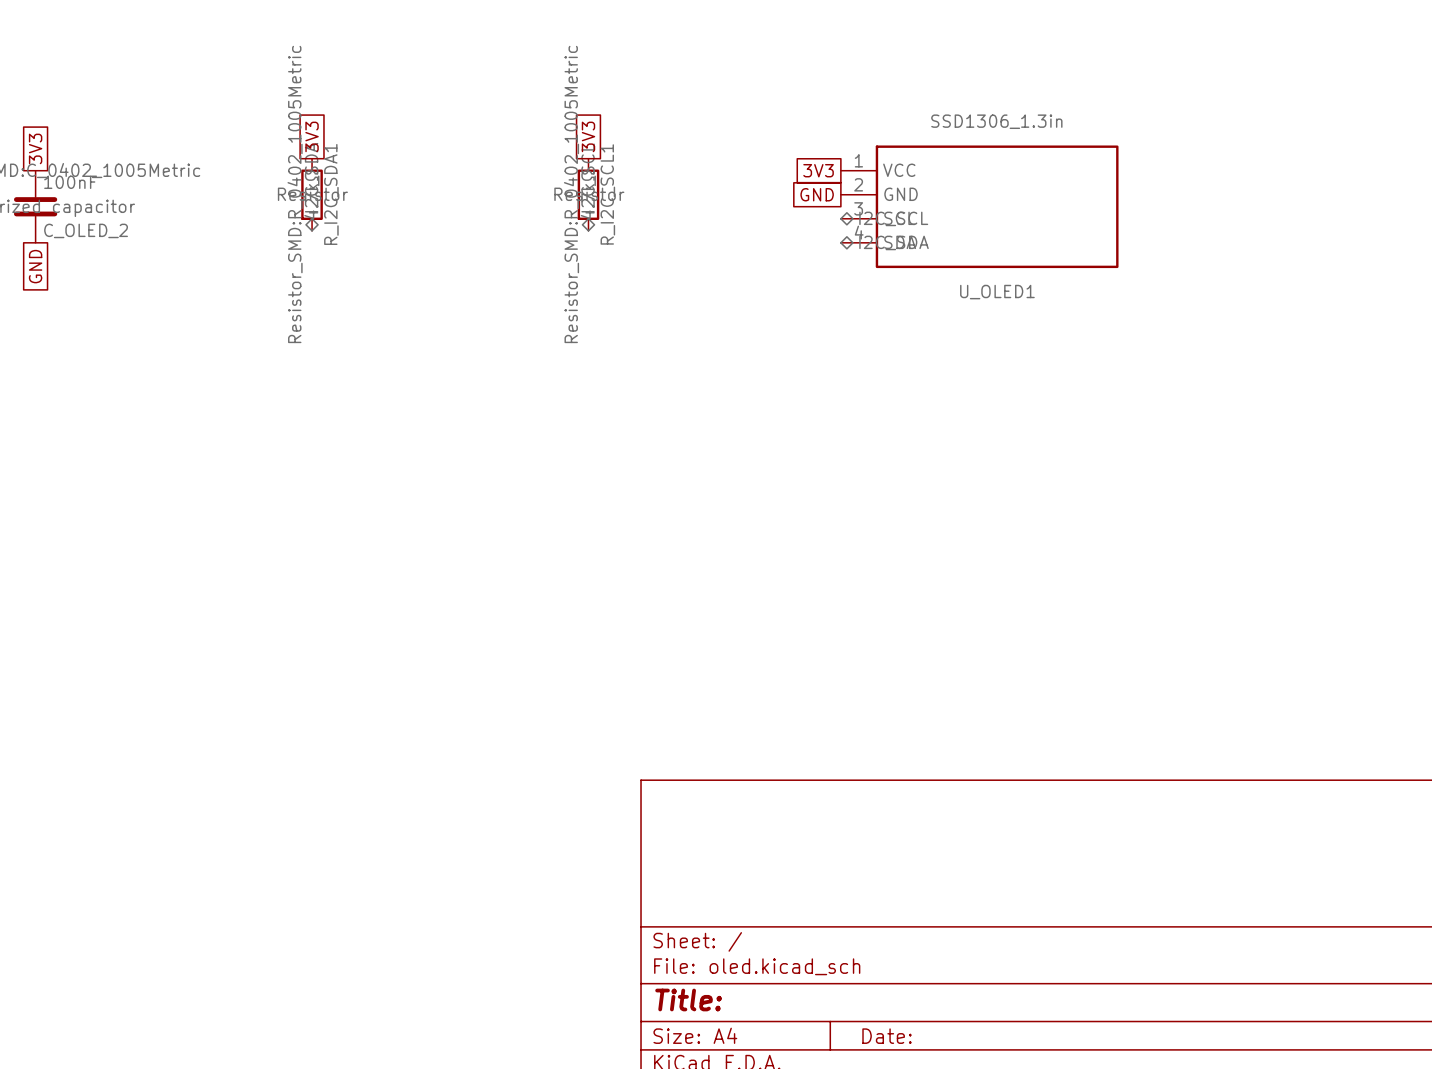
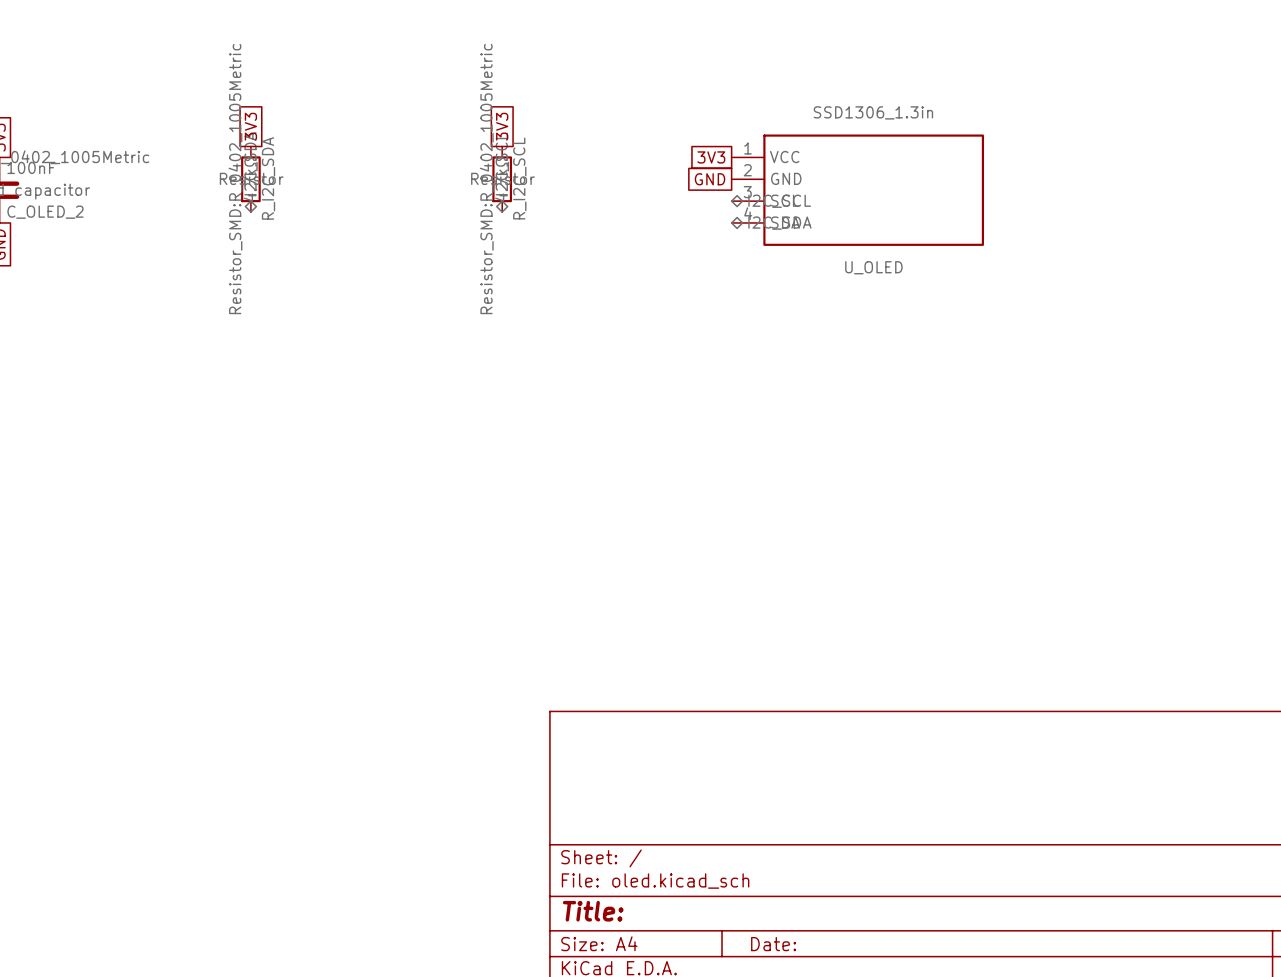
R_I2C_SDA1 name: R_I2C_SDA1 (331, 194) -> R_I2C_SDA (268, 178)
R_I2C_SCL1 name: R_I2C_SCL1 (607, 194) -> R_I2C_SCL (519, 178)
U_OLED1 name: U_OLED1 (997, 292) -> U_OLED (873, 267)

